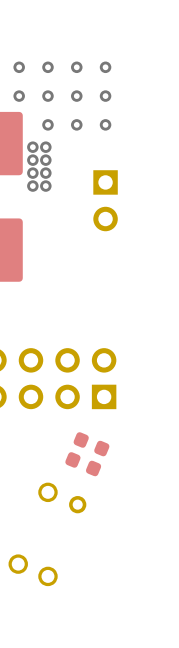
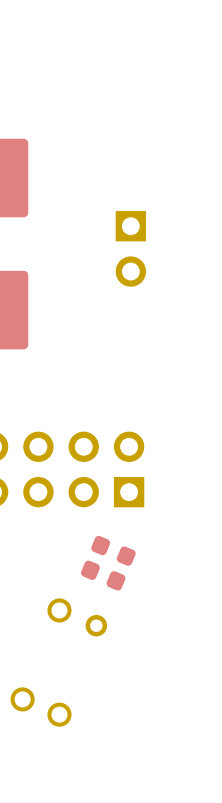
via: (19, 67) -> none
via: (47, 67) -> none
via: (76, 67) -> none
via: (105, 67) -> none
via: (19, 96) -> none
via: (47, 96) -> none
via: (76, 96) -> none
via: (105, 96) -> none
via: (47, 124) -> none
via: (76, 124) -> none
via: (105, 124) -> none
via: (32, 147) -> none
via: (45, 147) -> none
via: (32, 160) -> none
via: (45, 160) -> none
via: (32, 173) -> none
via: (45, 173) -> none
via: (32, 186) -> none
via: (45, 186) -> none

